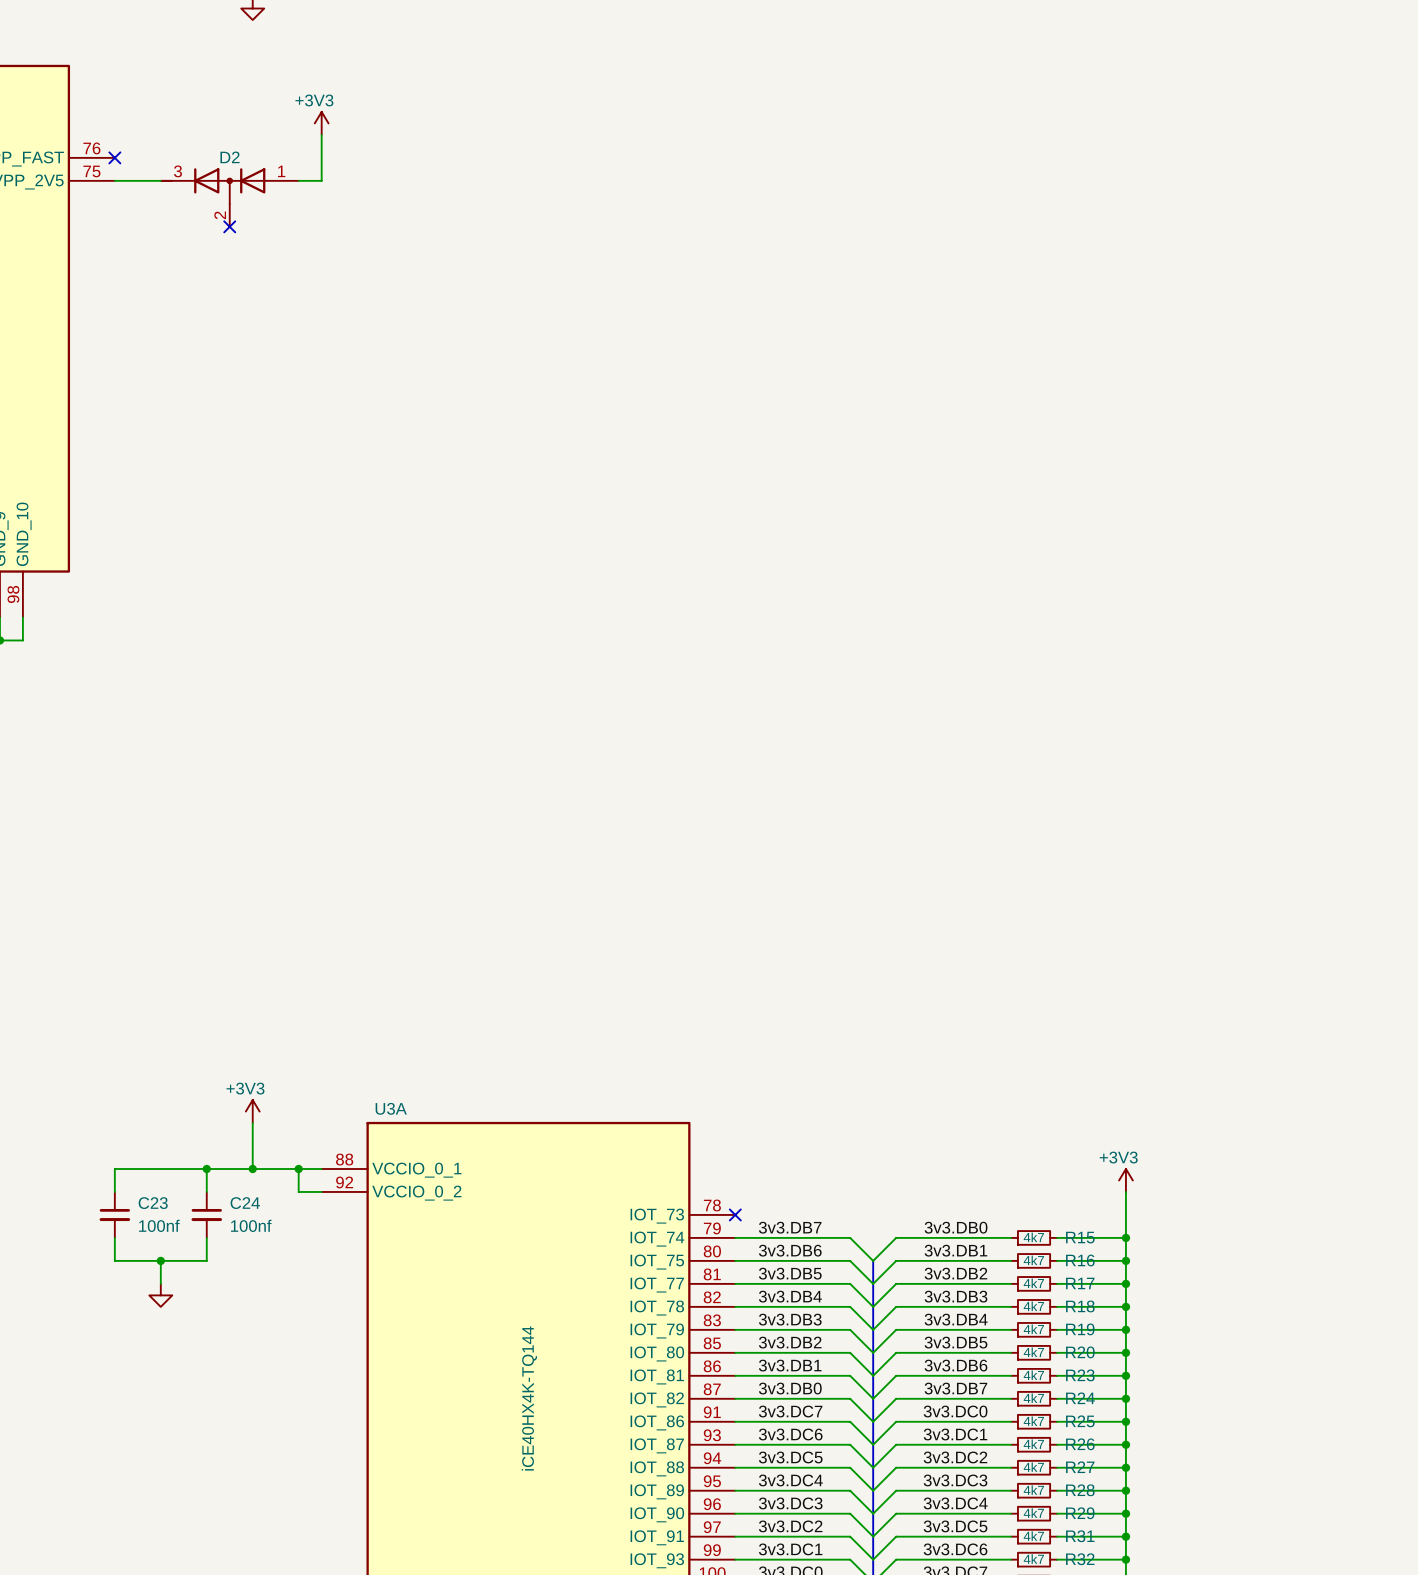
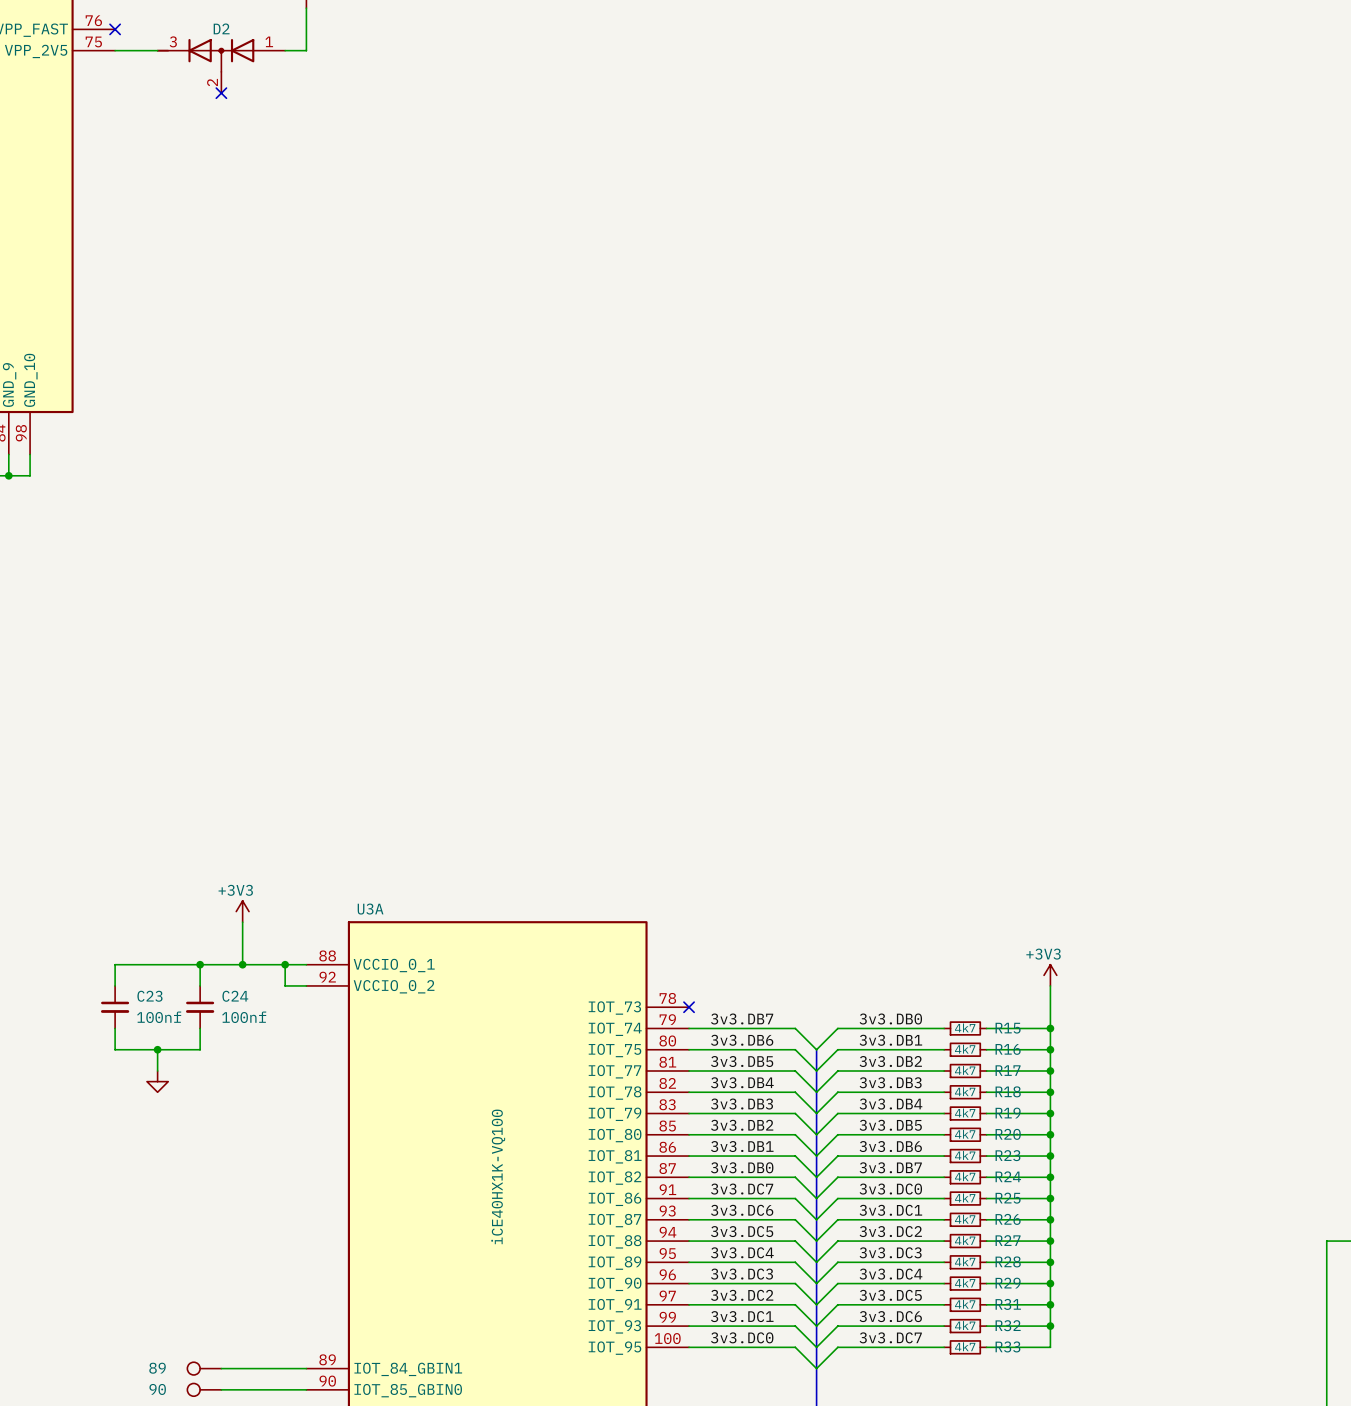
U3A value: iCE40HX4K-TQ144 (529, 1398) -> iCE40HX1K-VQ100 (498, 1176)

